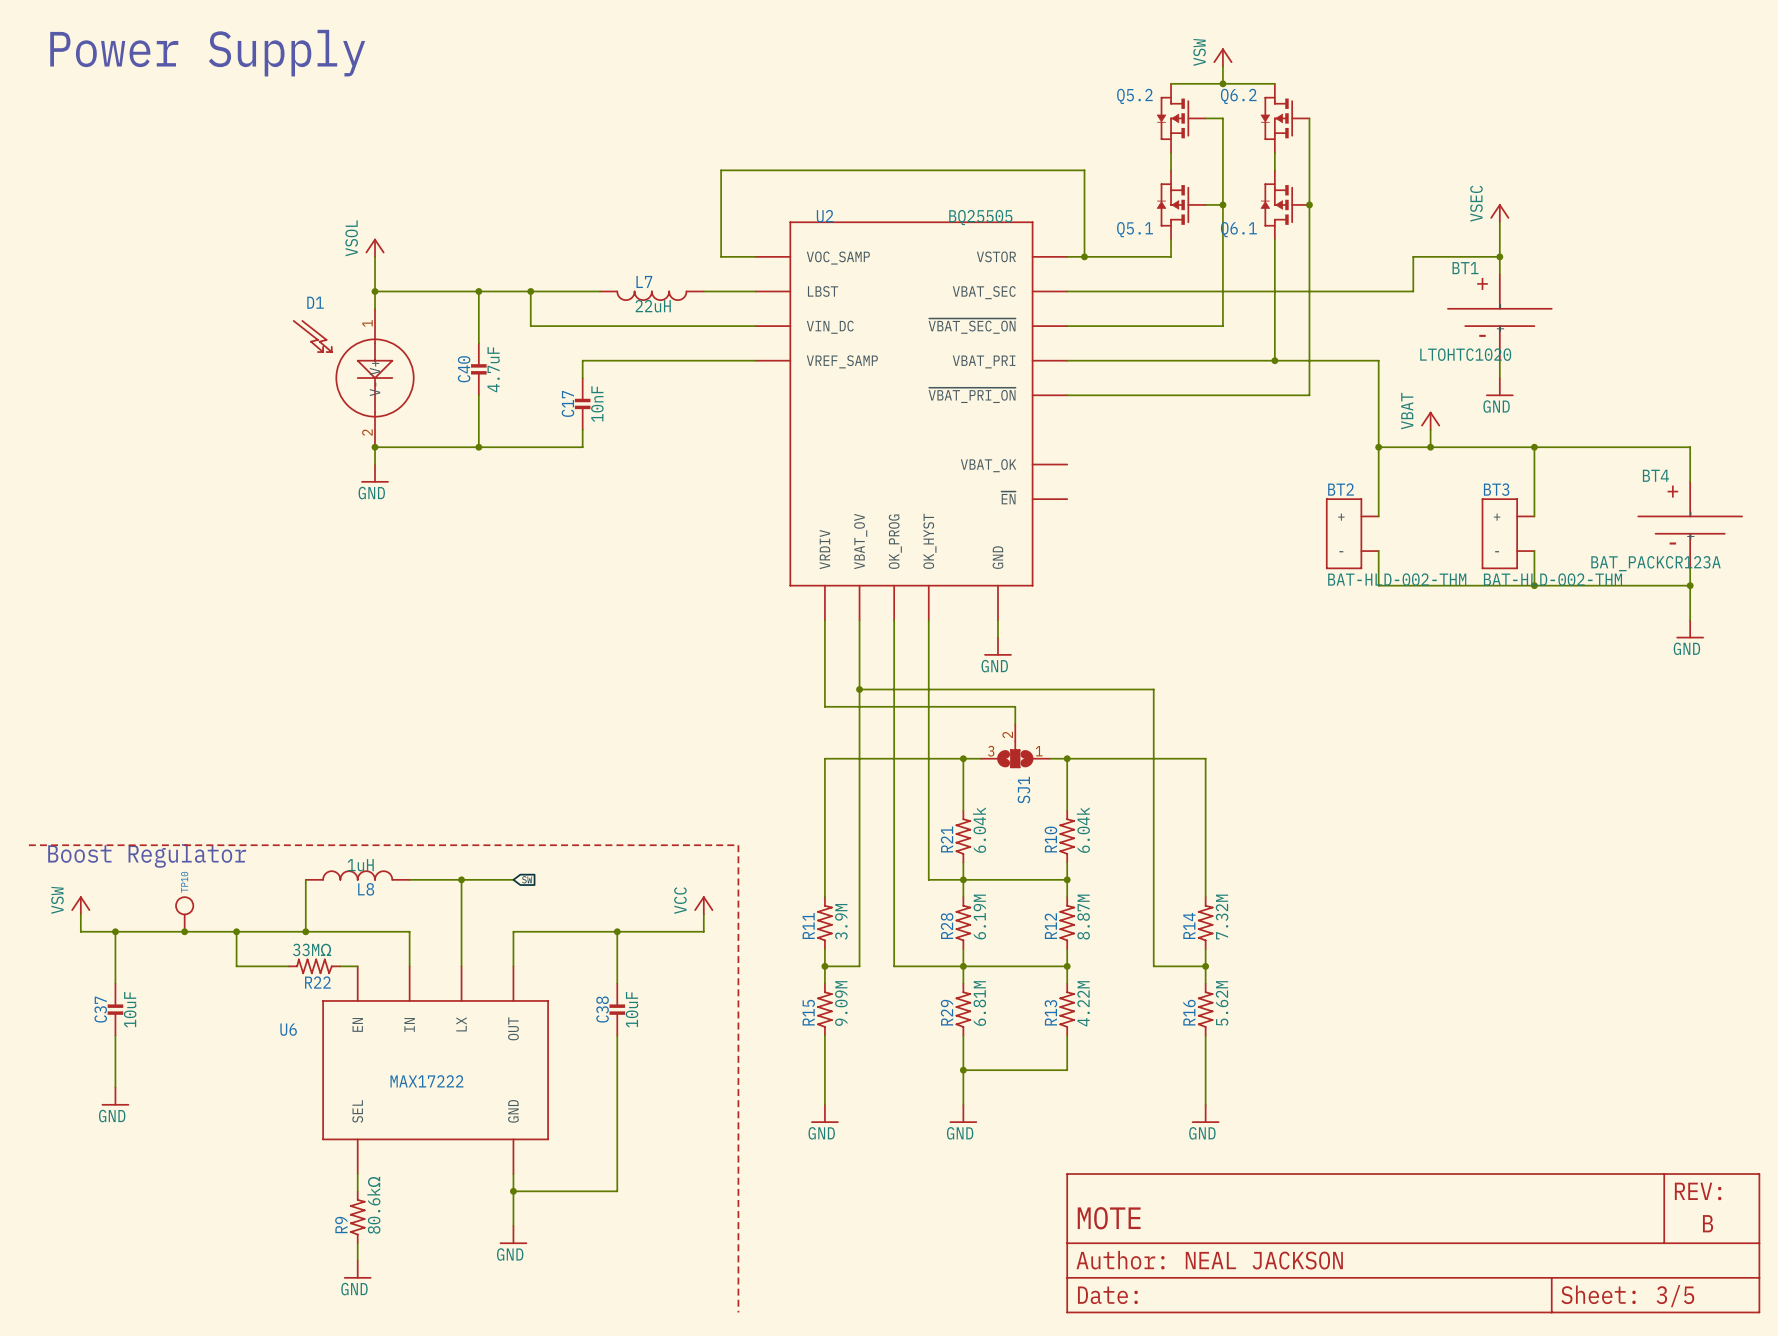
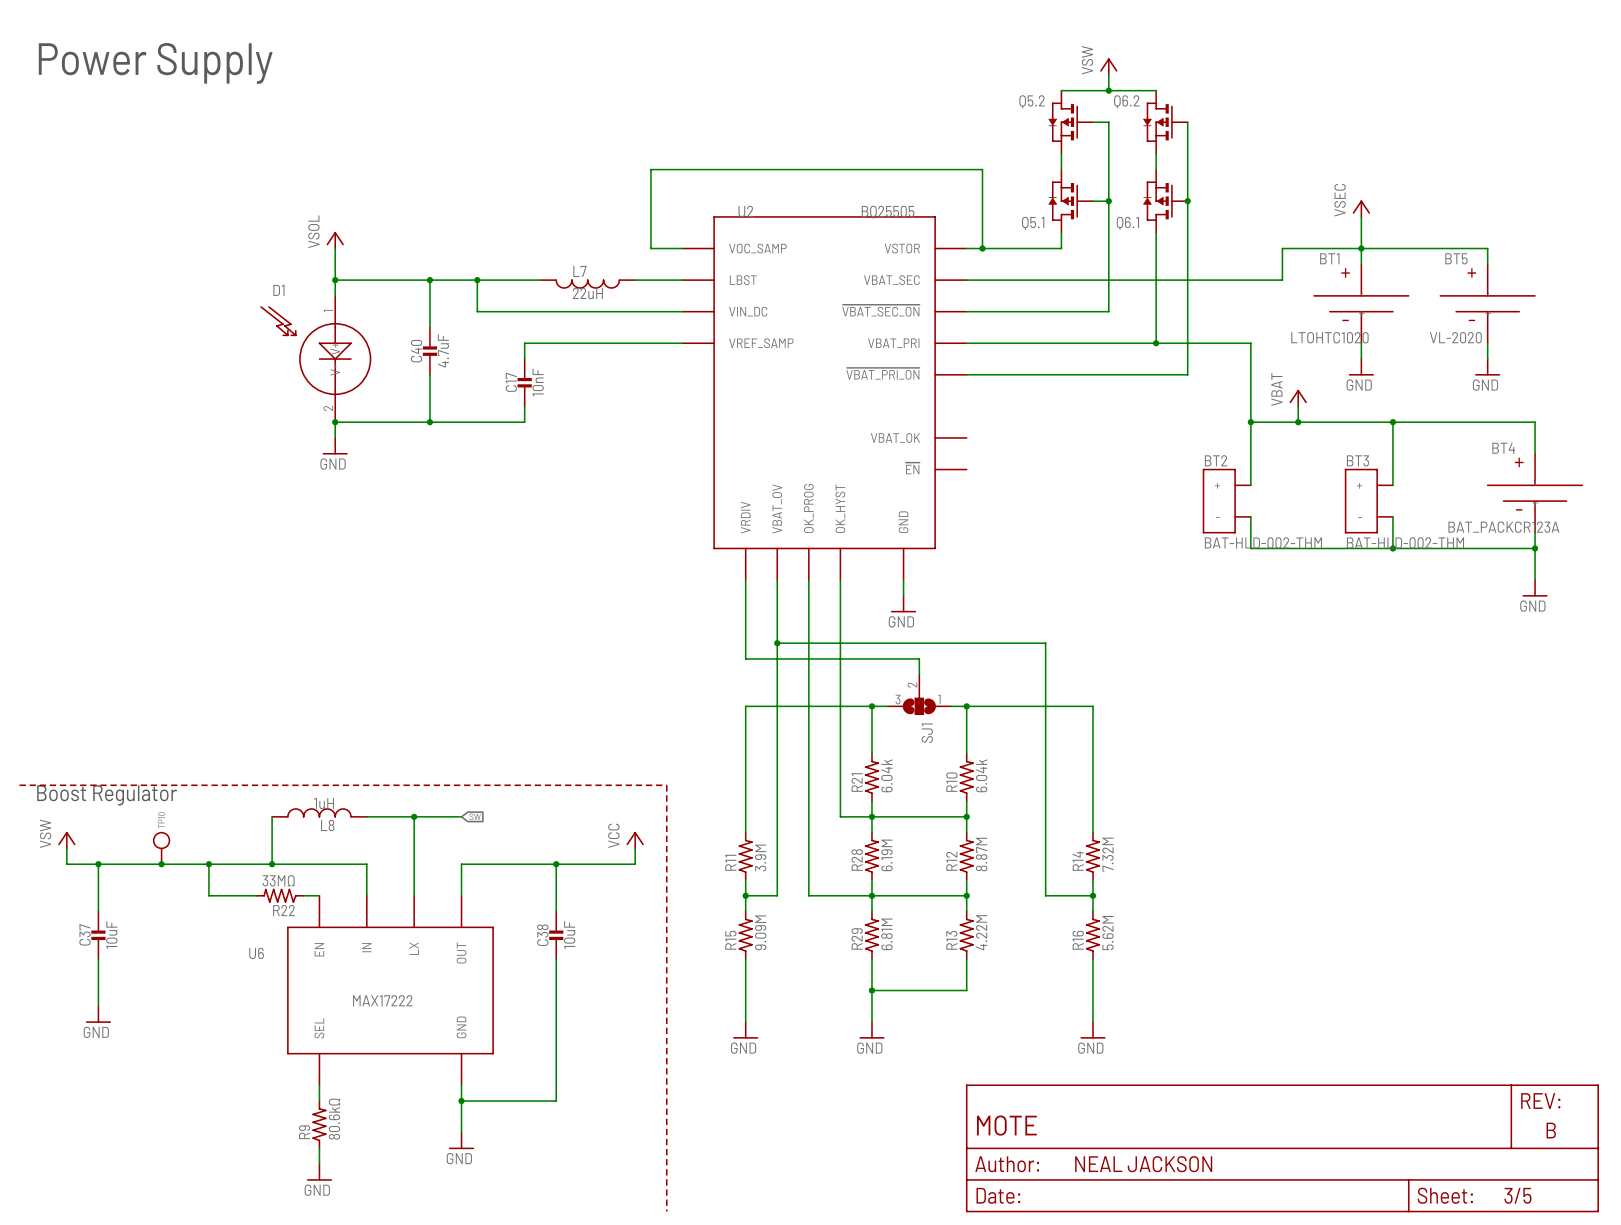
wire: none -> (1361, 248) (1487, 248) (1487, 264)
BT5: none -> VL-2020 (1487, 303)
wire: none -> (1487, 343) (1487, 359)
power symbol: none -> GND (1487, 367)

